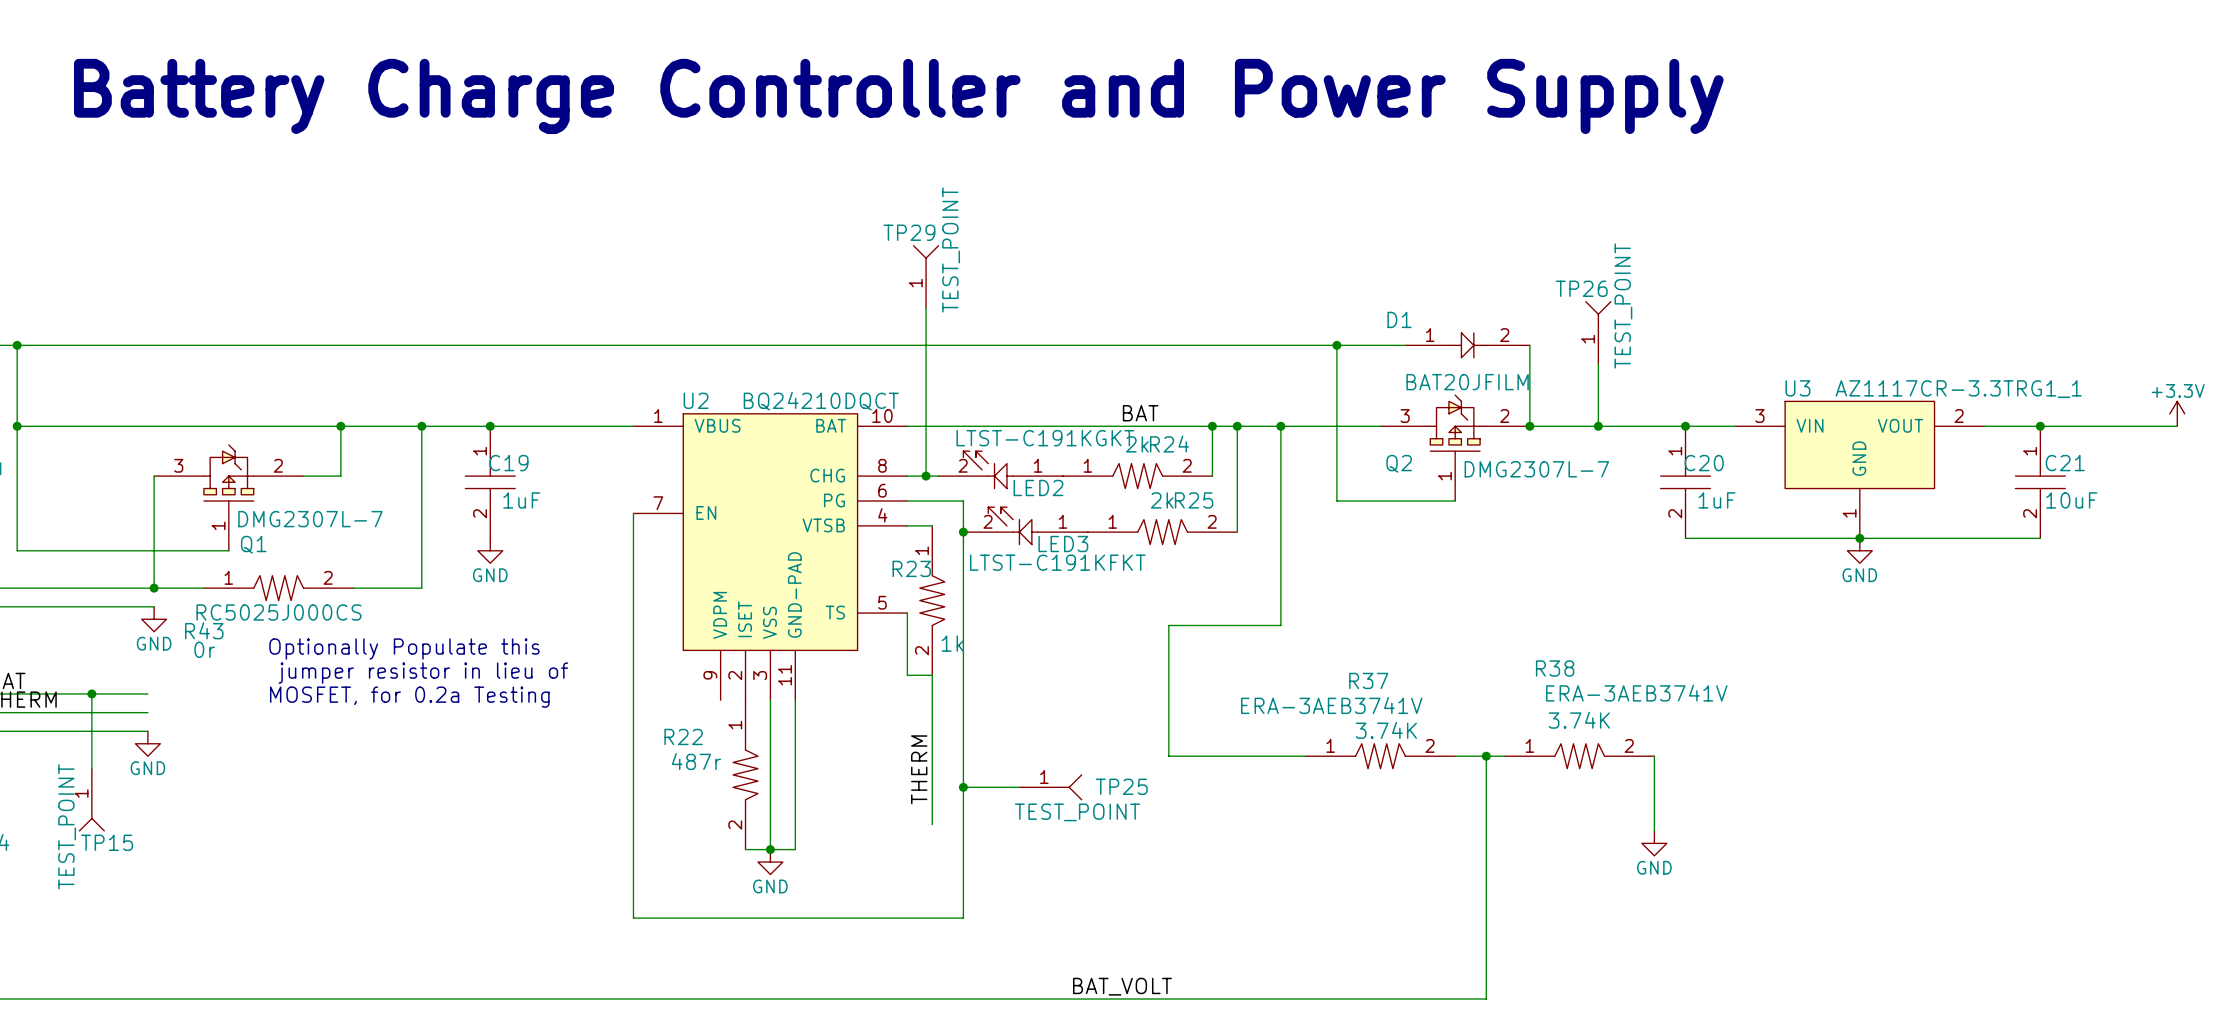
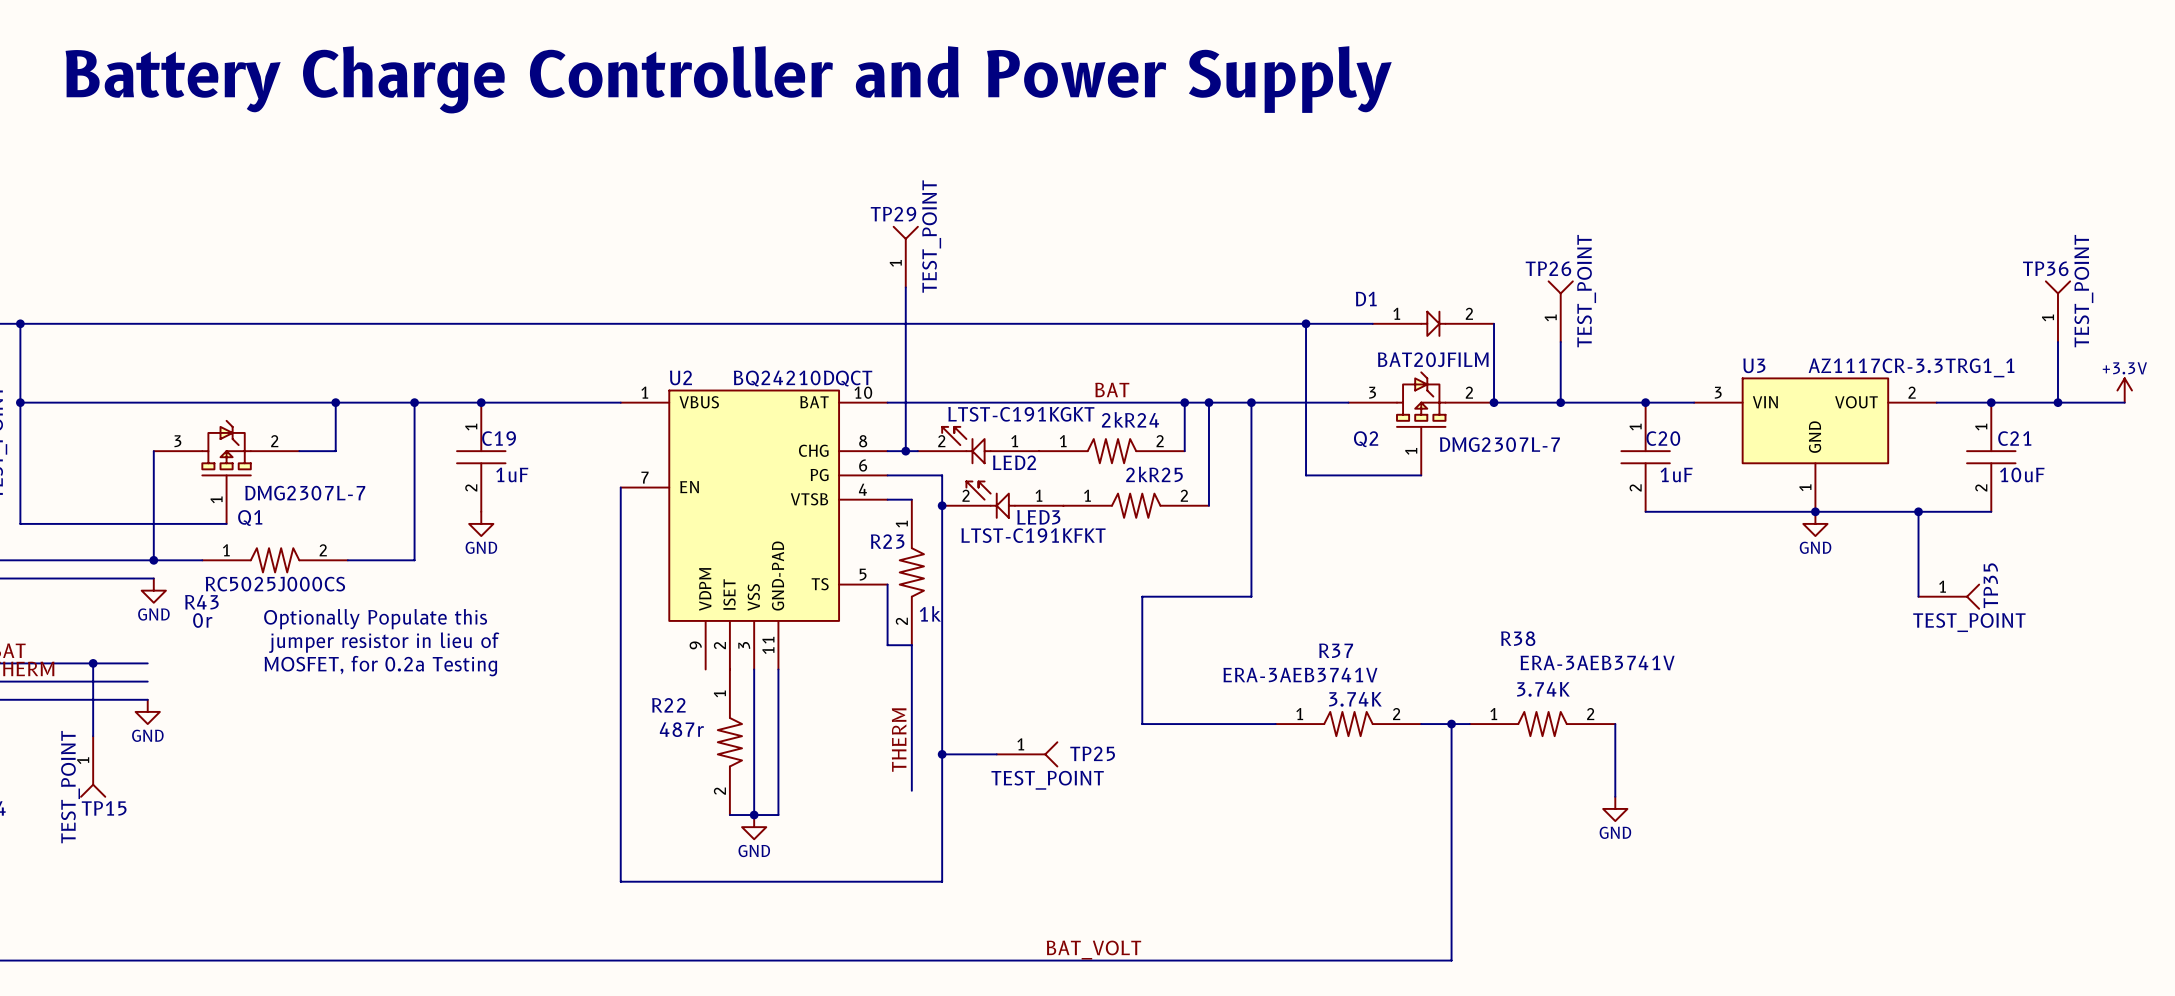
TP36: none -> TEST_POINT (2057, 311)
wire: none -> (2057, 342) (2057, 402)
junction: none -> (2057, 402)
wire: none -> (1918, 511) (1918, 596)
junction: none -> (1918, 511)
TP35: none -> TEST_POINT (1948, 596)

